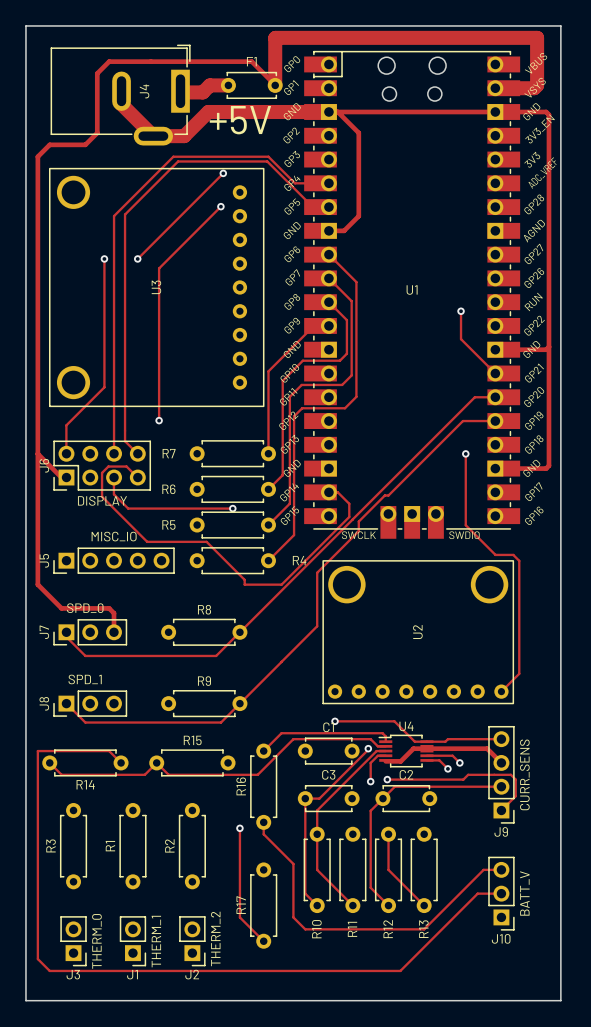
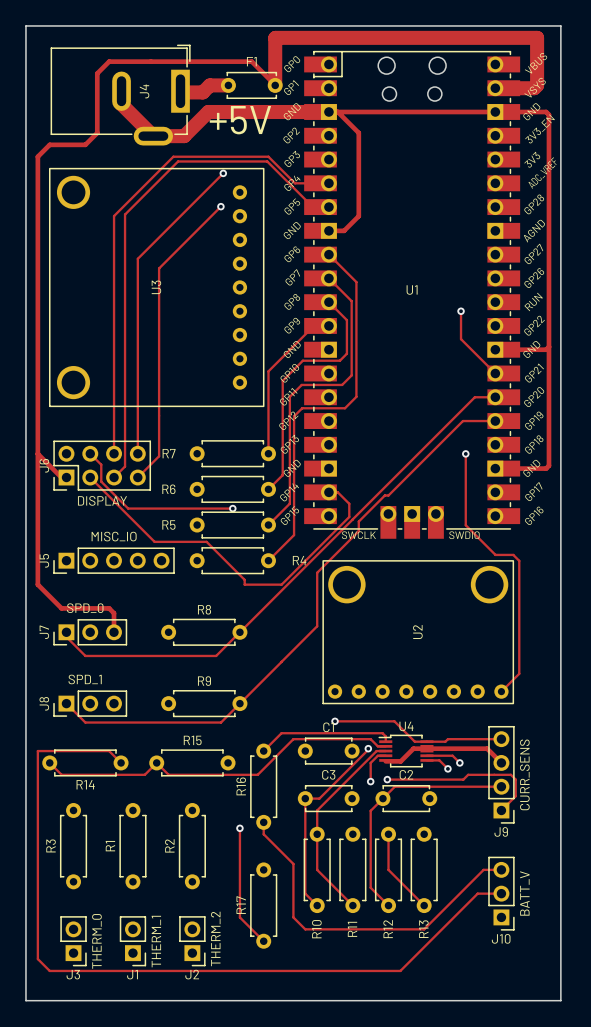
track: (104, 258) (104, 387) (66, 425) (66, 453) -> none
via: (104, 258) -> none
track: none -> (137, 258) (137, 453)
via: (137, 258) -> none
track: none -> (159, 420) (159, 456) (137, 477)
via: (159, 420) -> none
track: (125, 441) (137, 453) -> (125, 441) (125, 466) (114, 477)
track: (113, 477) (113, 494) -> (90, 453) (101, 464) (101, 481) (113, 494)
track: (137, 477) (126, 466) (108, 466) (102, 472) (102, 496) (147, 541) (154, 541) -> (90, 477) (154, 541)

